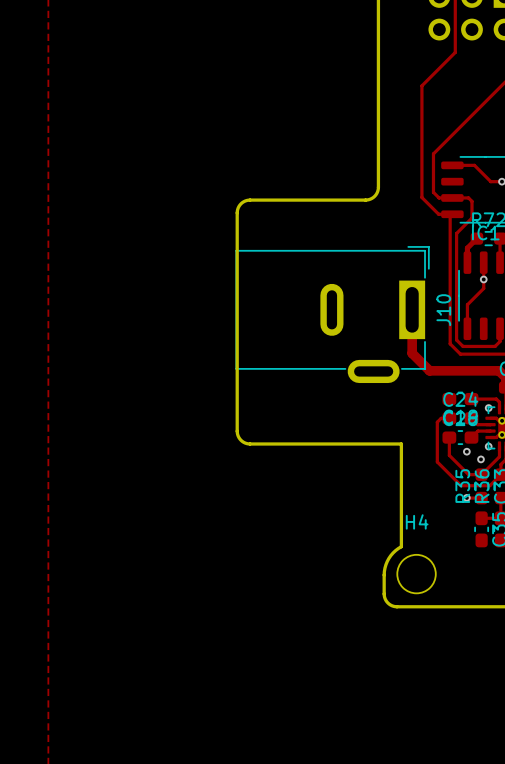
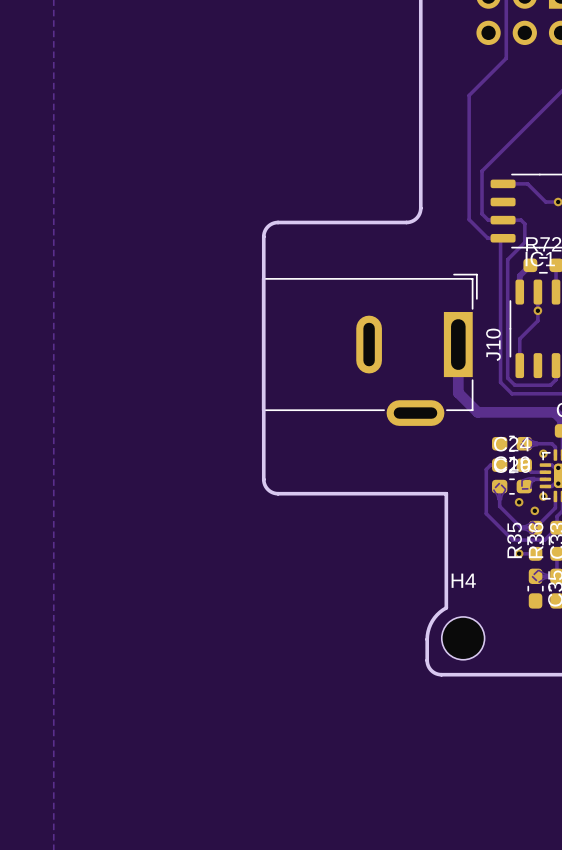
zone outline: none -> (527, 437) (537, 441) (537, 445) (527, 449) (520, 443) (527, 437)
zone outline: none -> (533, 477) (534, 477) (534, 481) (531, 482) (530, 488) (521, 488) (522, 480) (533, 477)
zone outline: none -> (499, 483) (505, 489) (501, 500) (497, 500) (493, 489) (499, 483)
zone outline: none -> (532, 521) (522, 526) (522, 529) (532, 533) (538, 527) (532, 521)
zone outline: none -> (538, 570) (549, 574) (549, 578) (538, 582) (532, 576) (538, 570)

